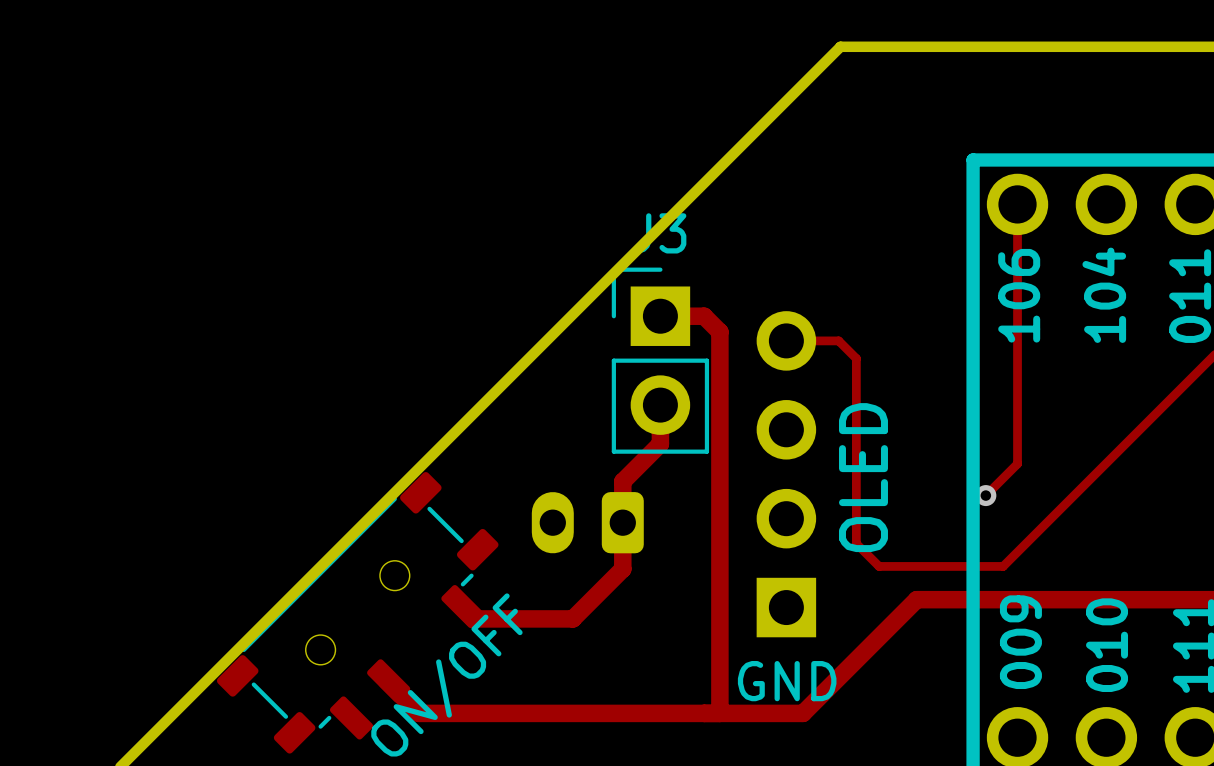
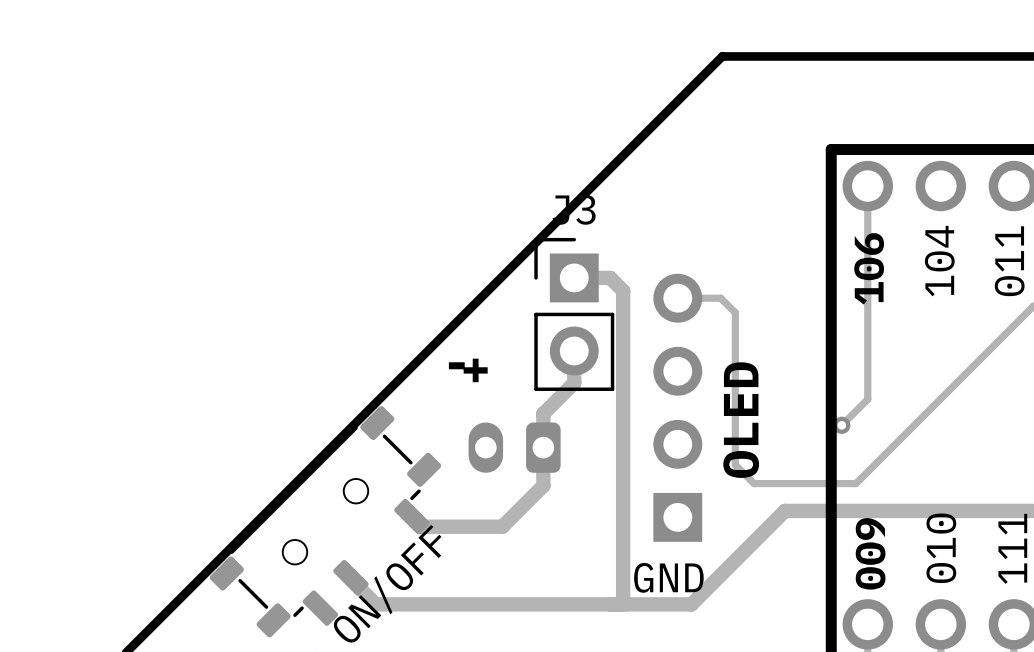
text: none -> - (456, 365)
text: none -> + (475, 370)

